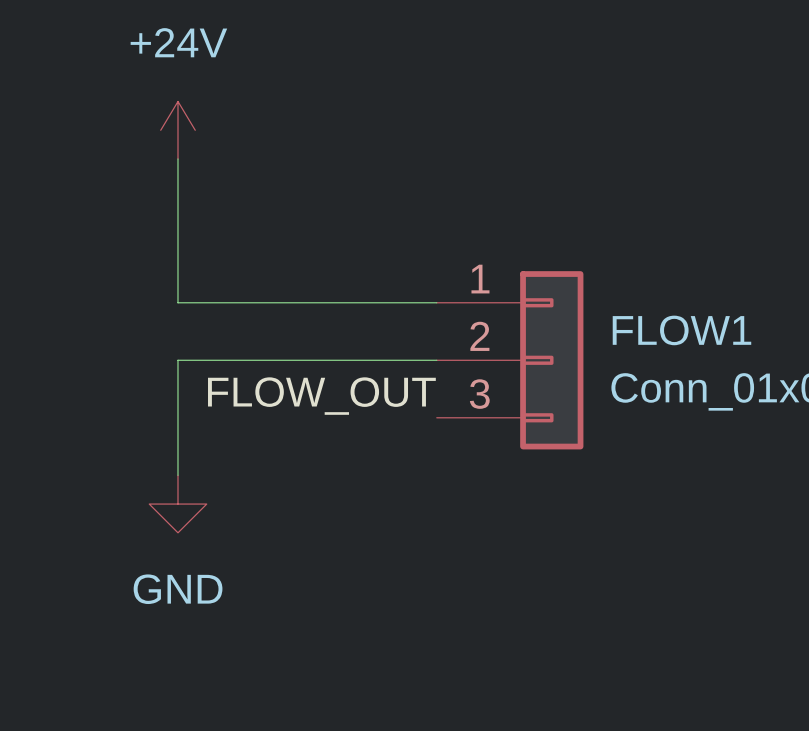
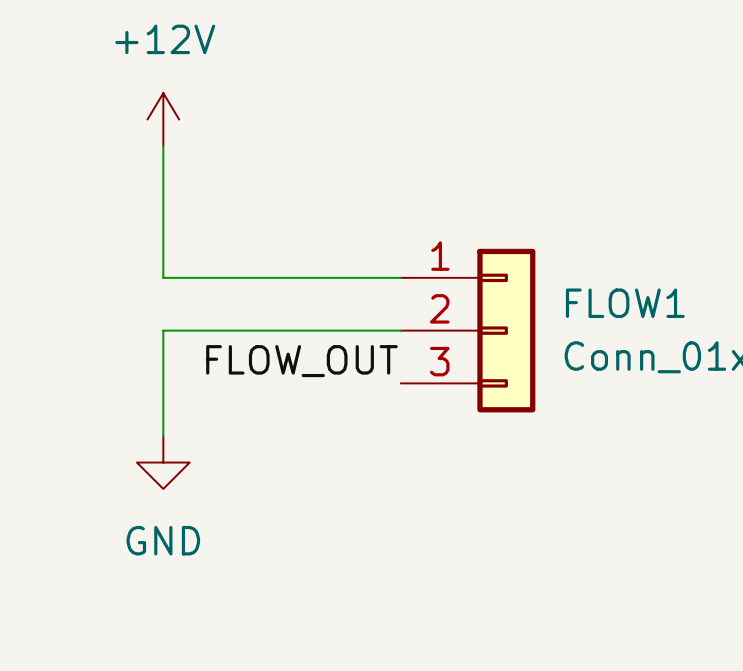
power symbol: +24V (177, 130) -> +12V (163, 119)

